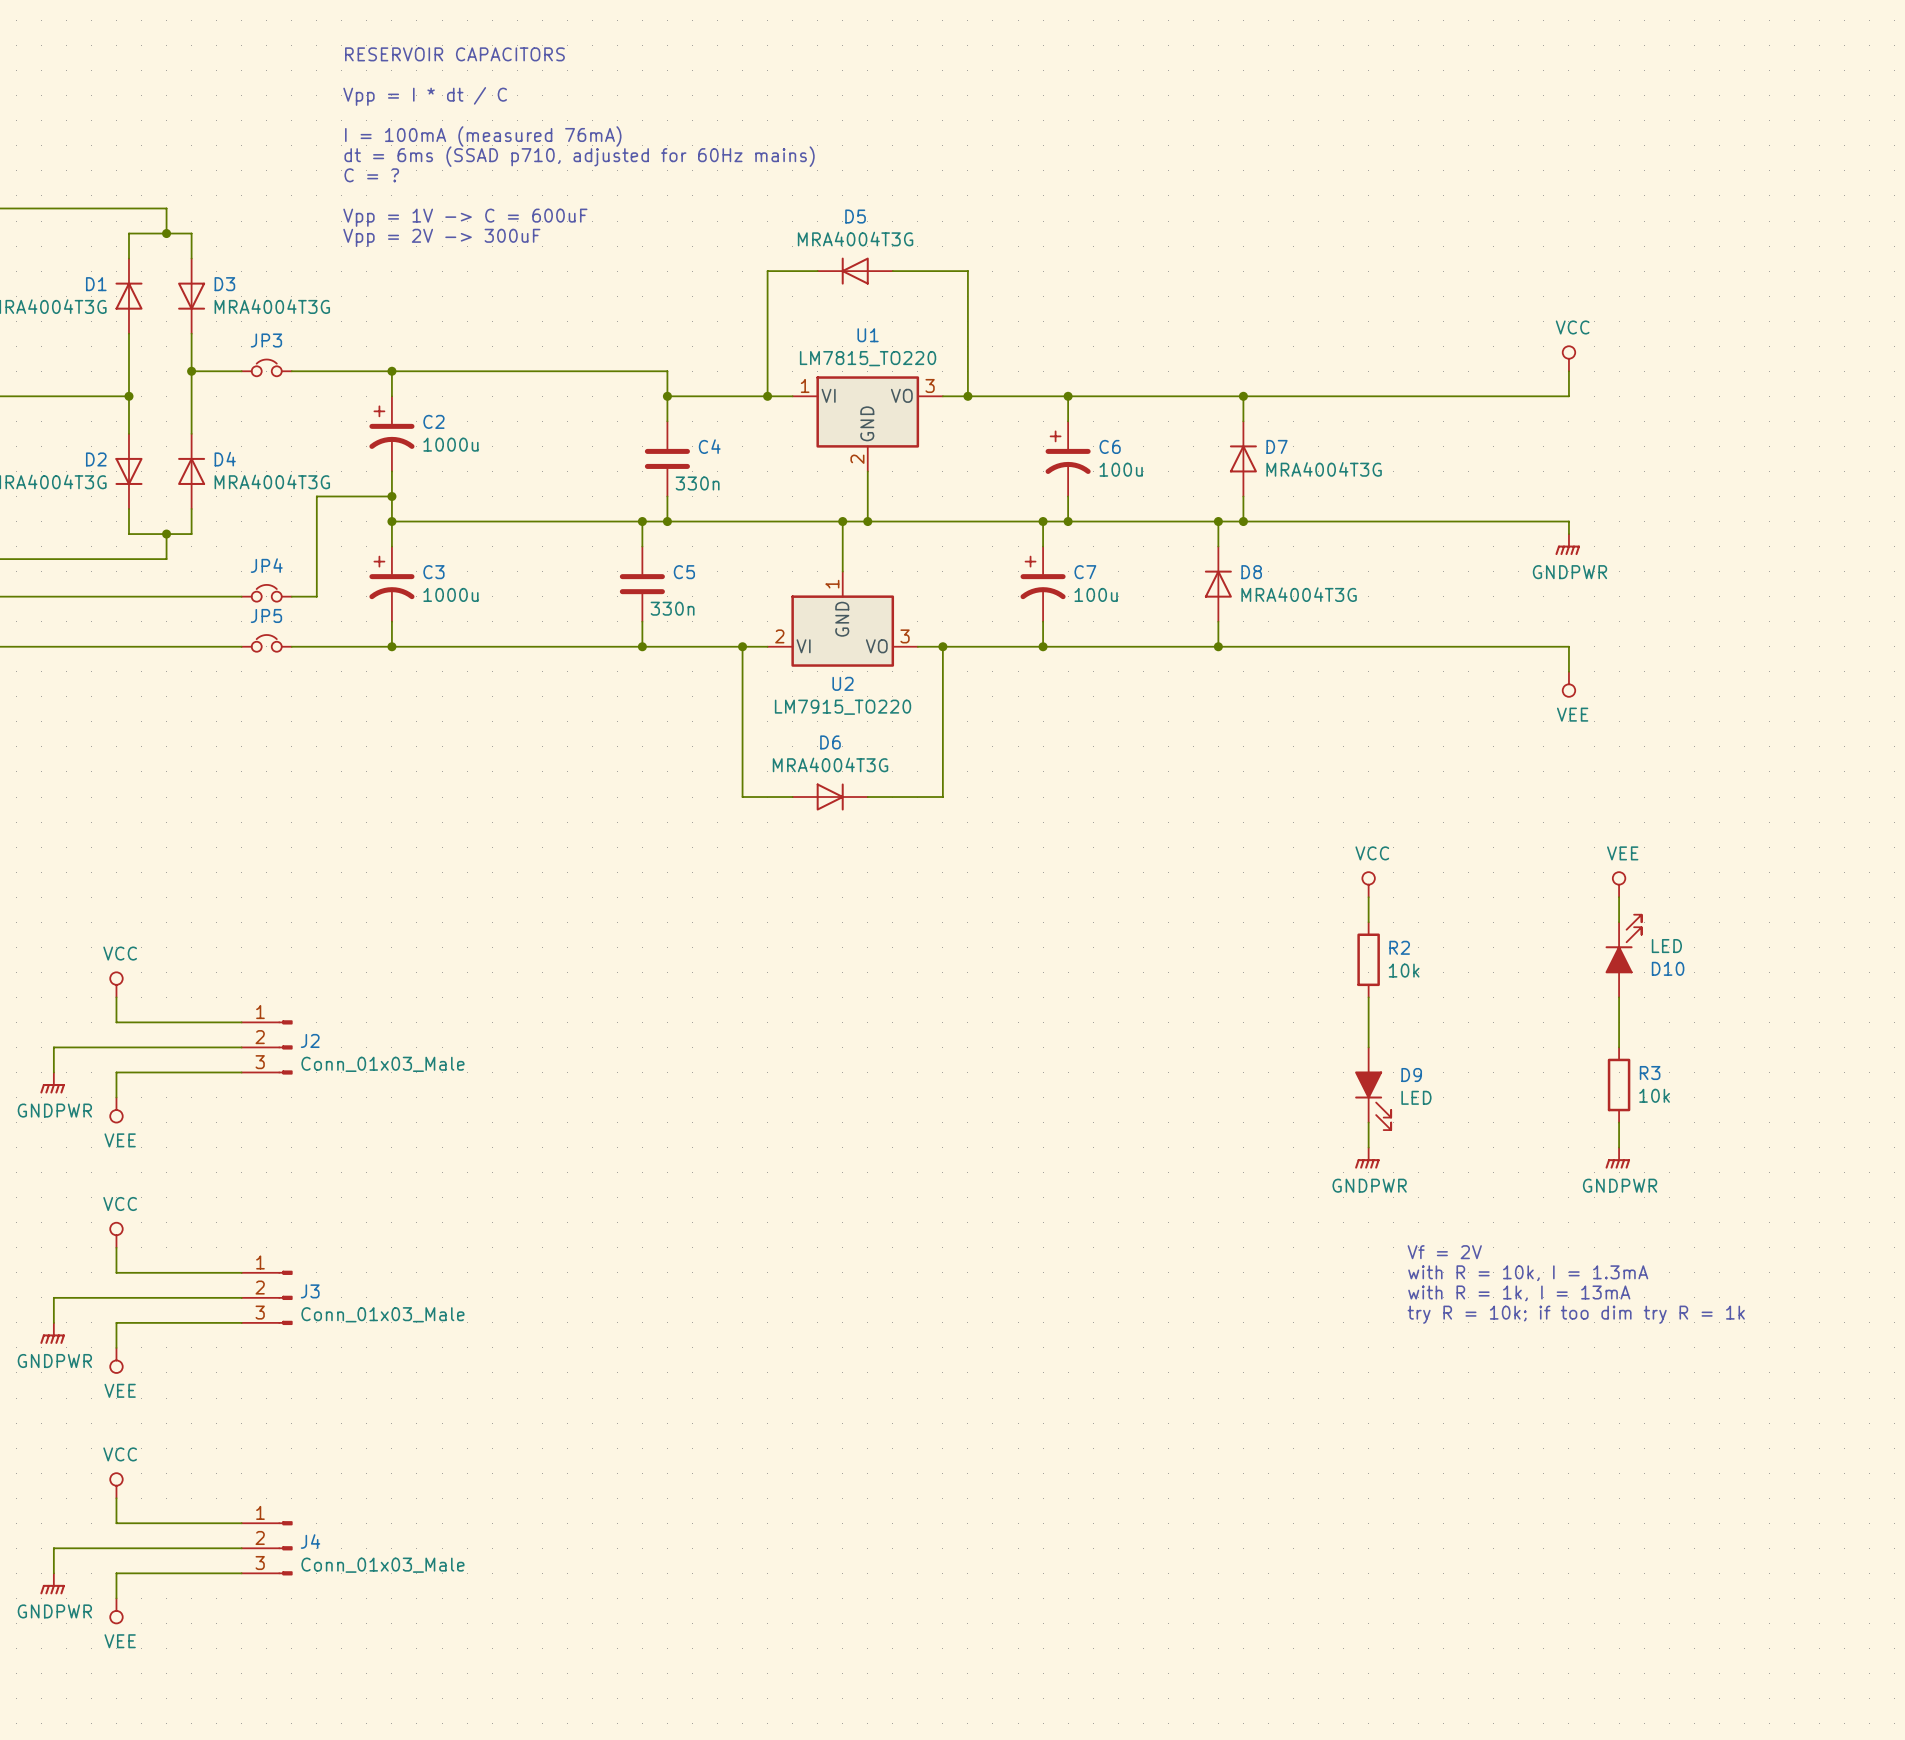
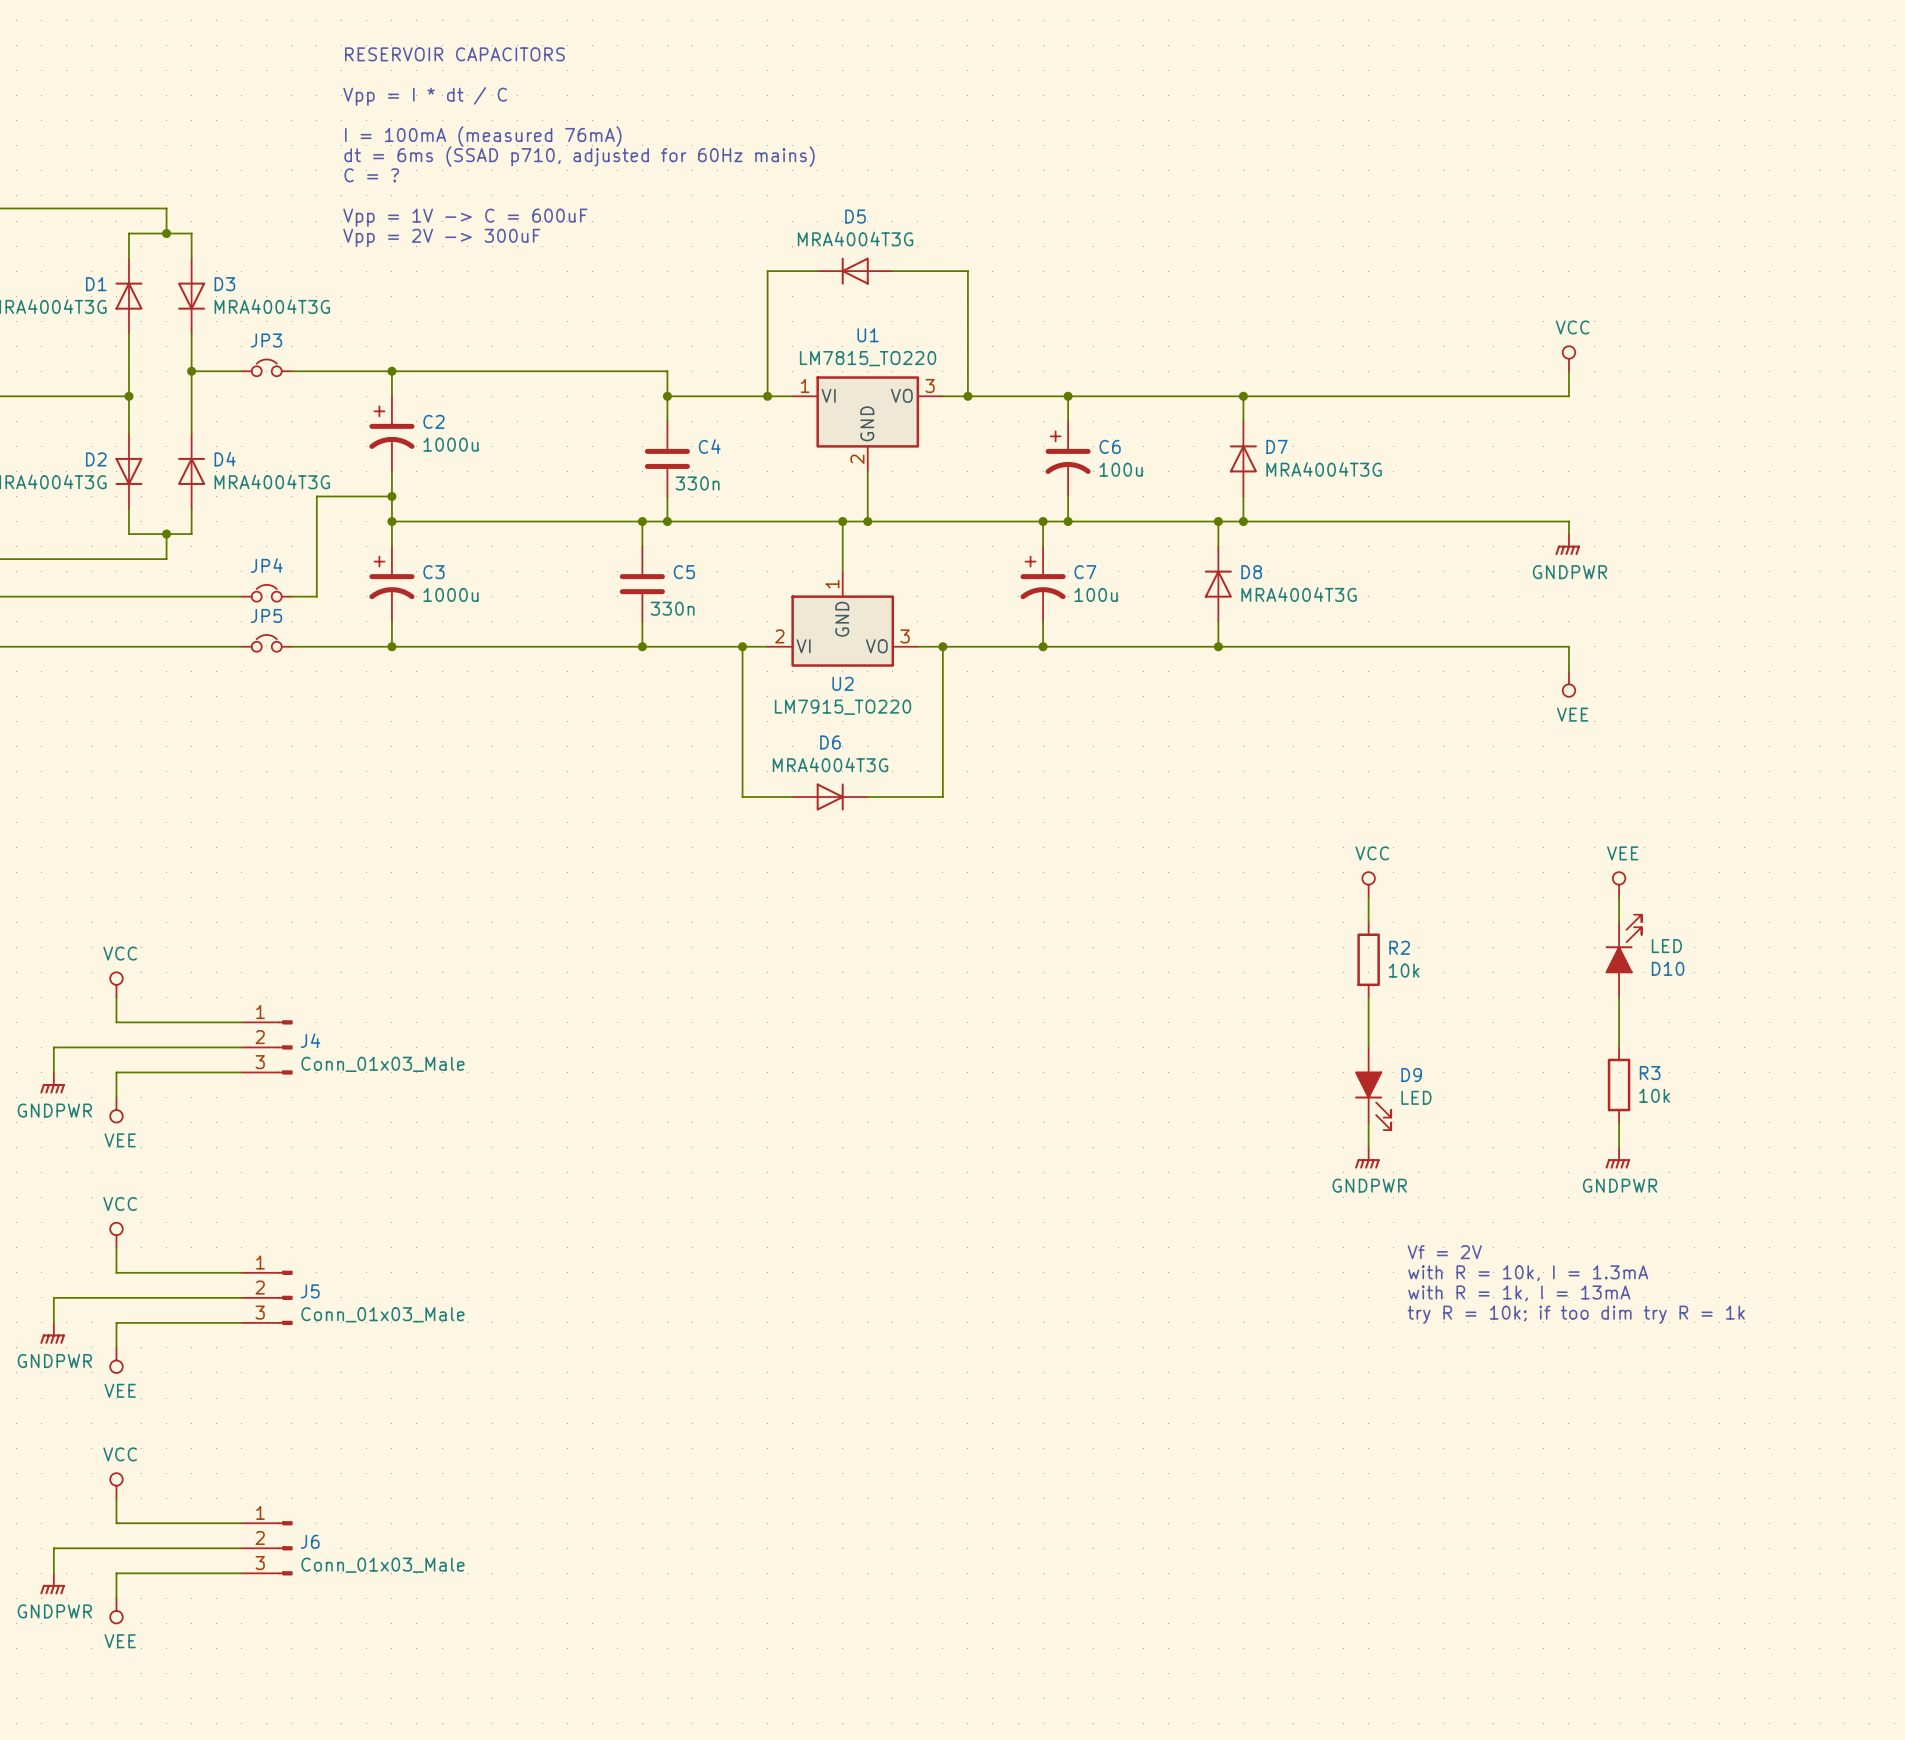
J2 name: J2 (310, 1040) -> J4 (310, 1040)
J3 name: J3 (310, 1291) -> J5 (310, 1291)
J4 name: J4 (310, 1541) -> J6 (310, 1541)

